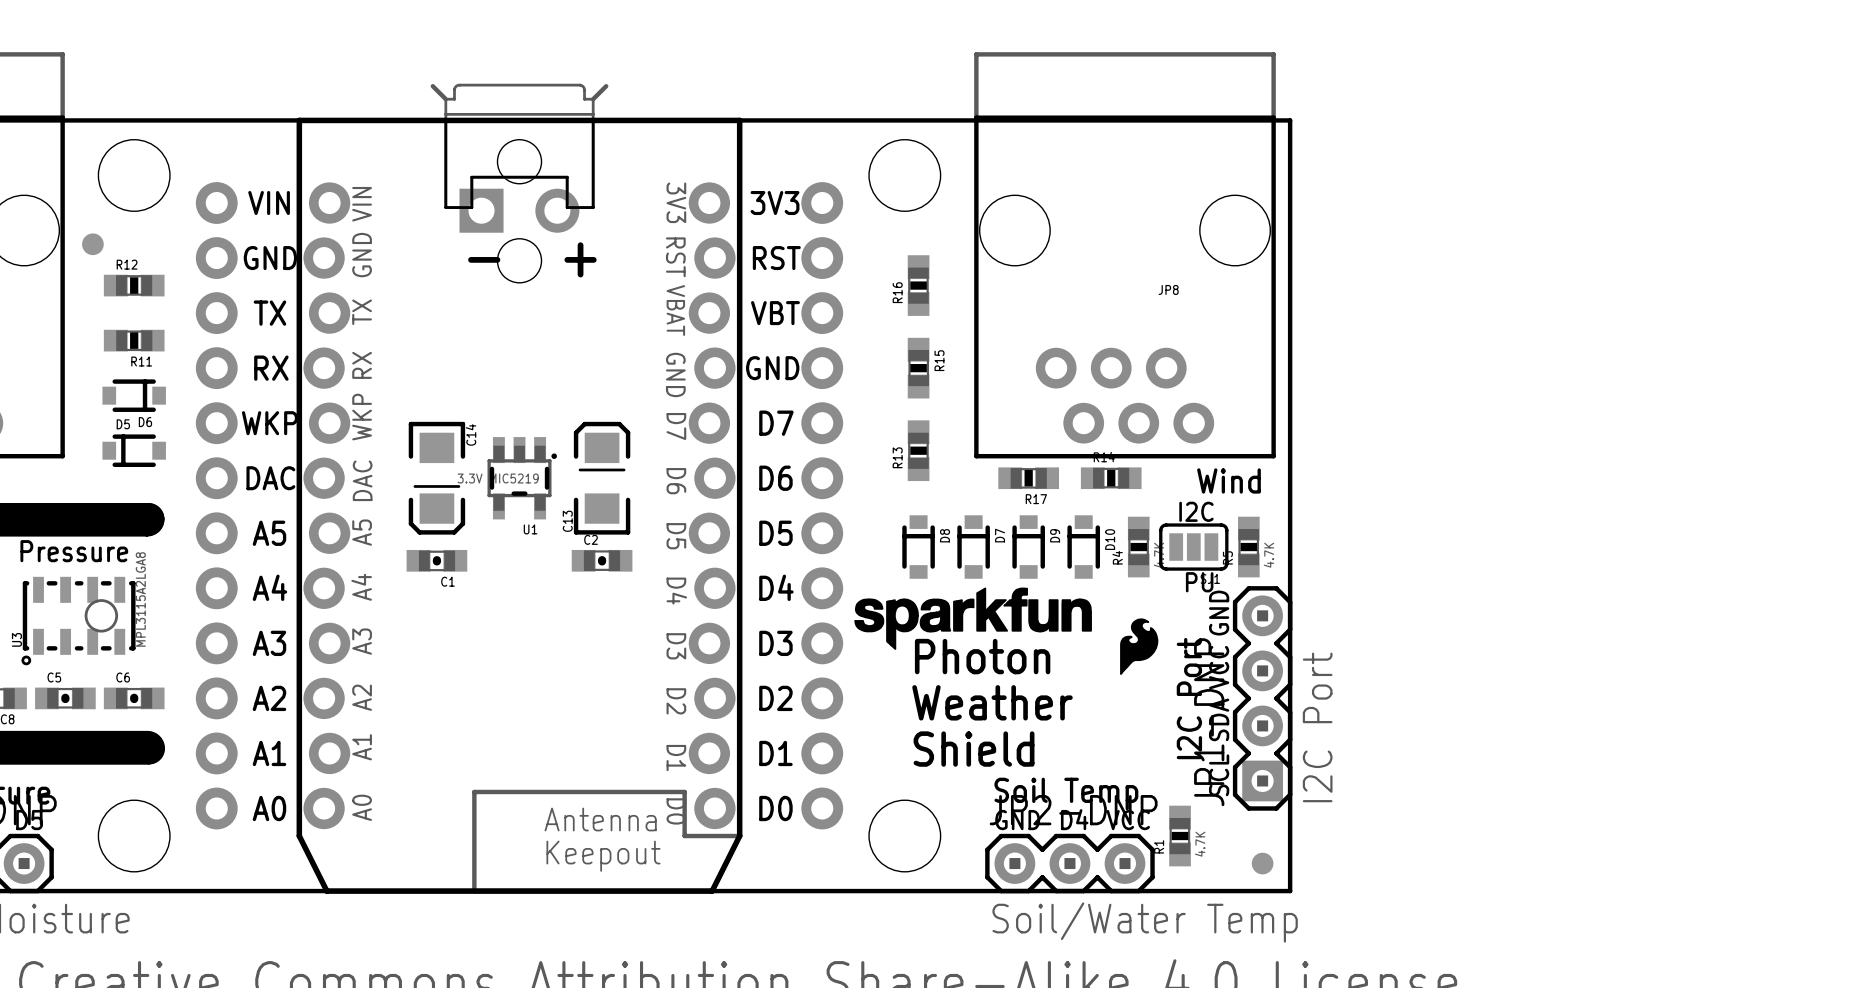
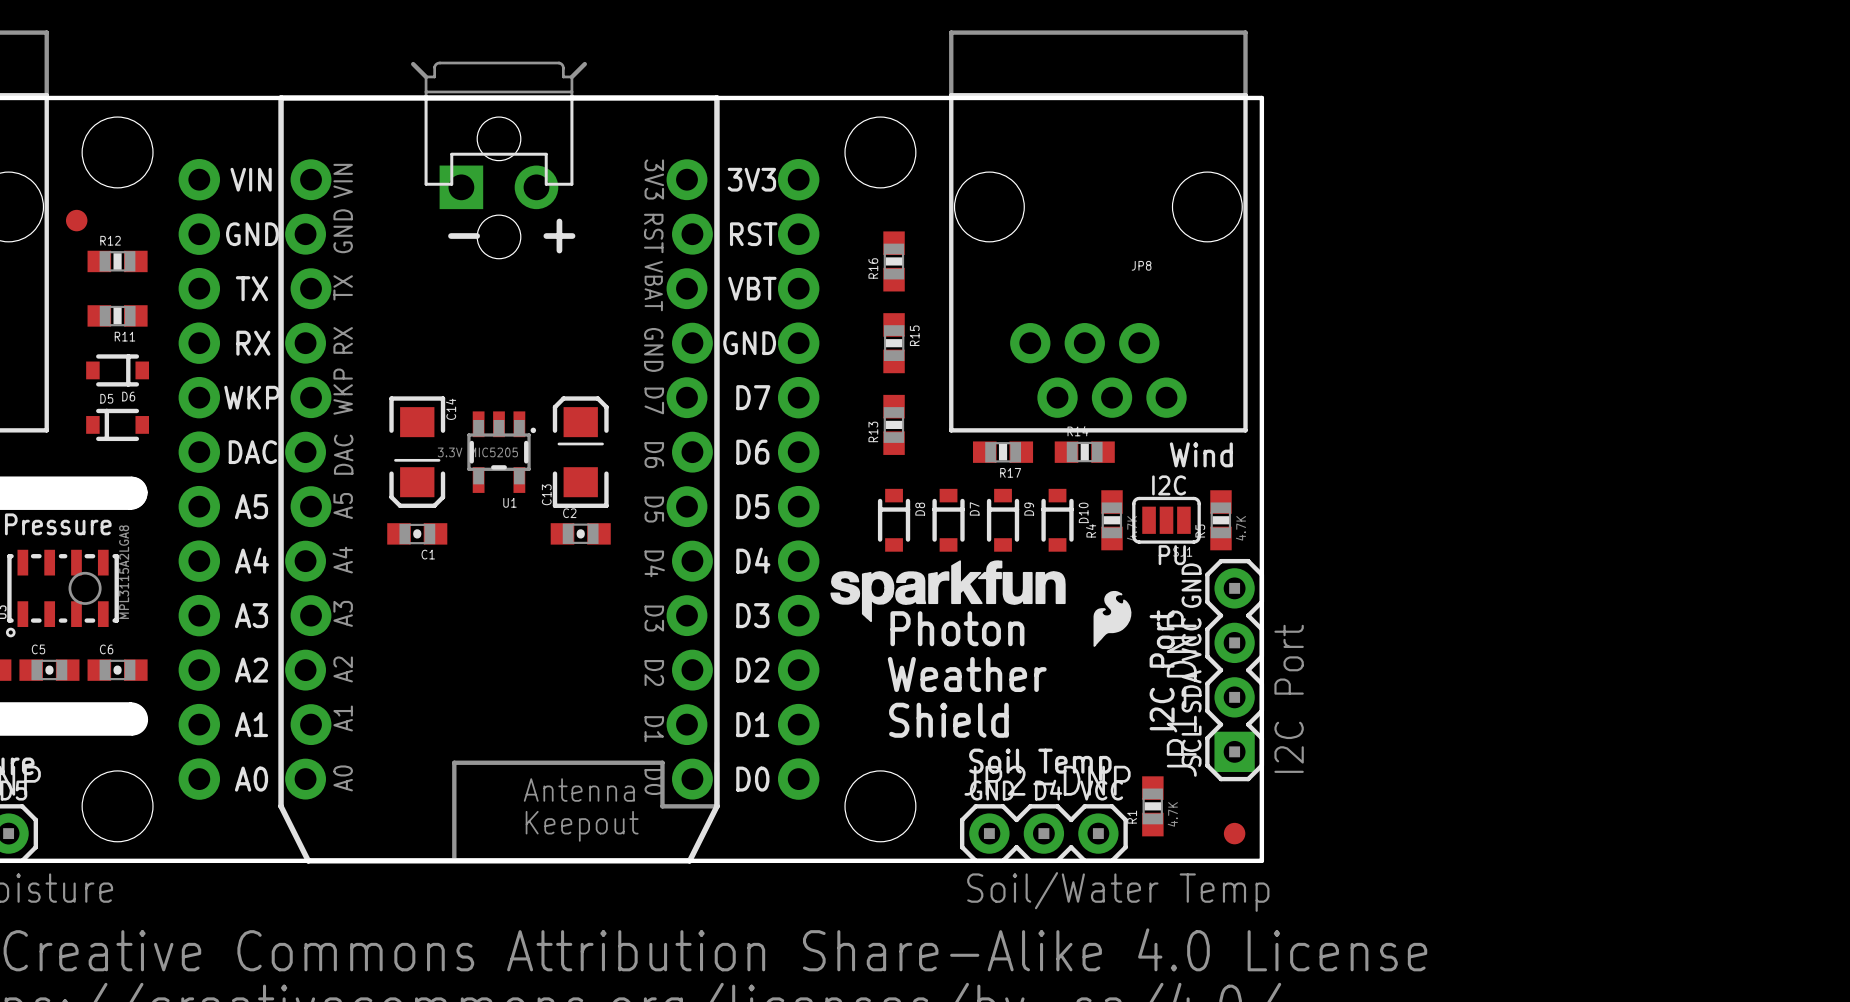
U1 value: 3.3V MIC5219 (498, 478) -> 3.3V MIC5205 (477, 452)

